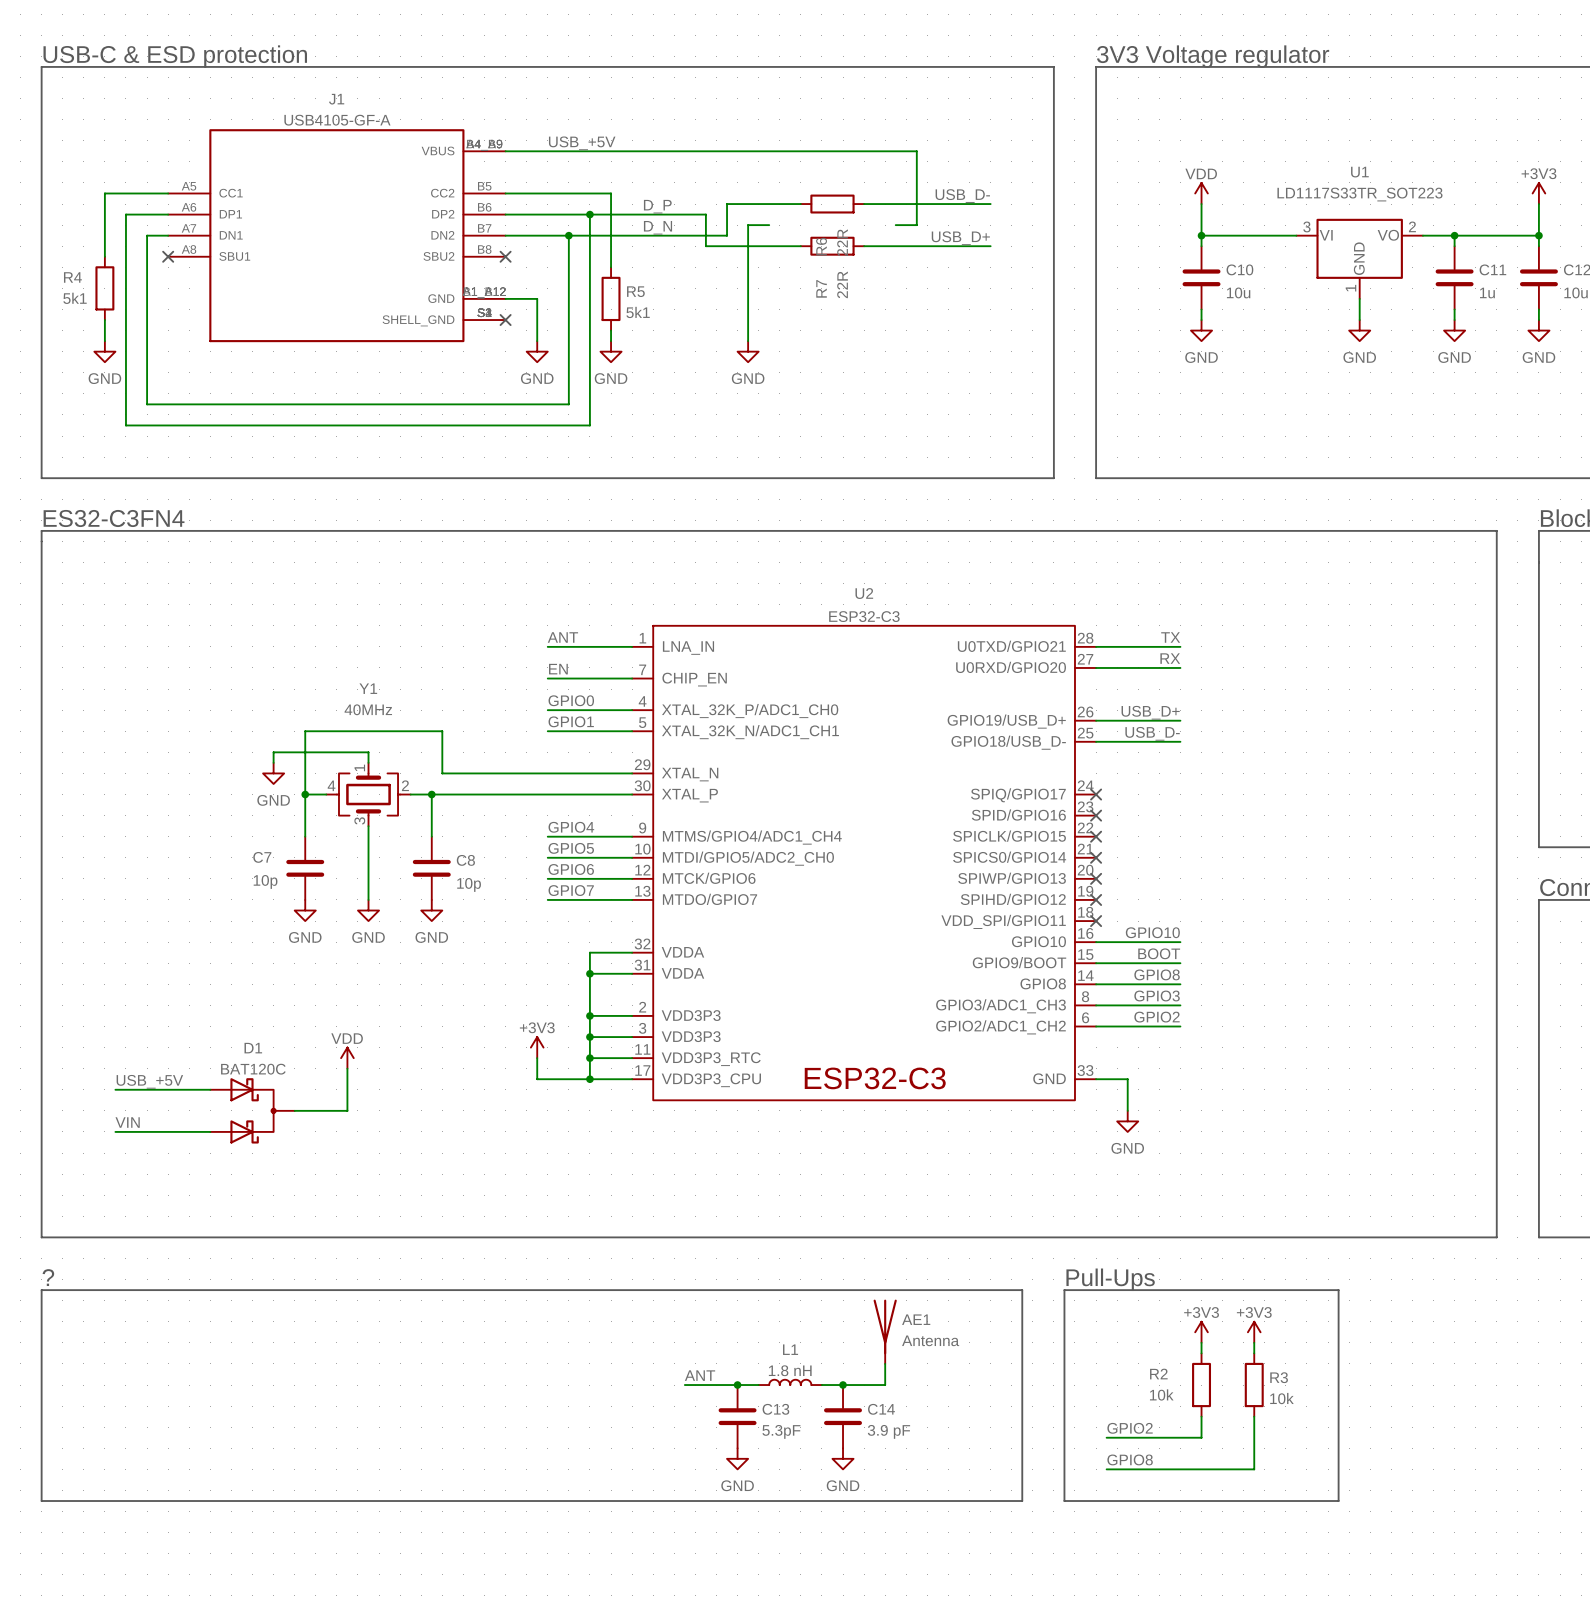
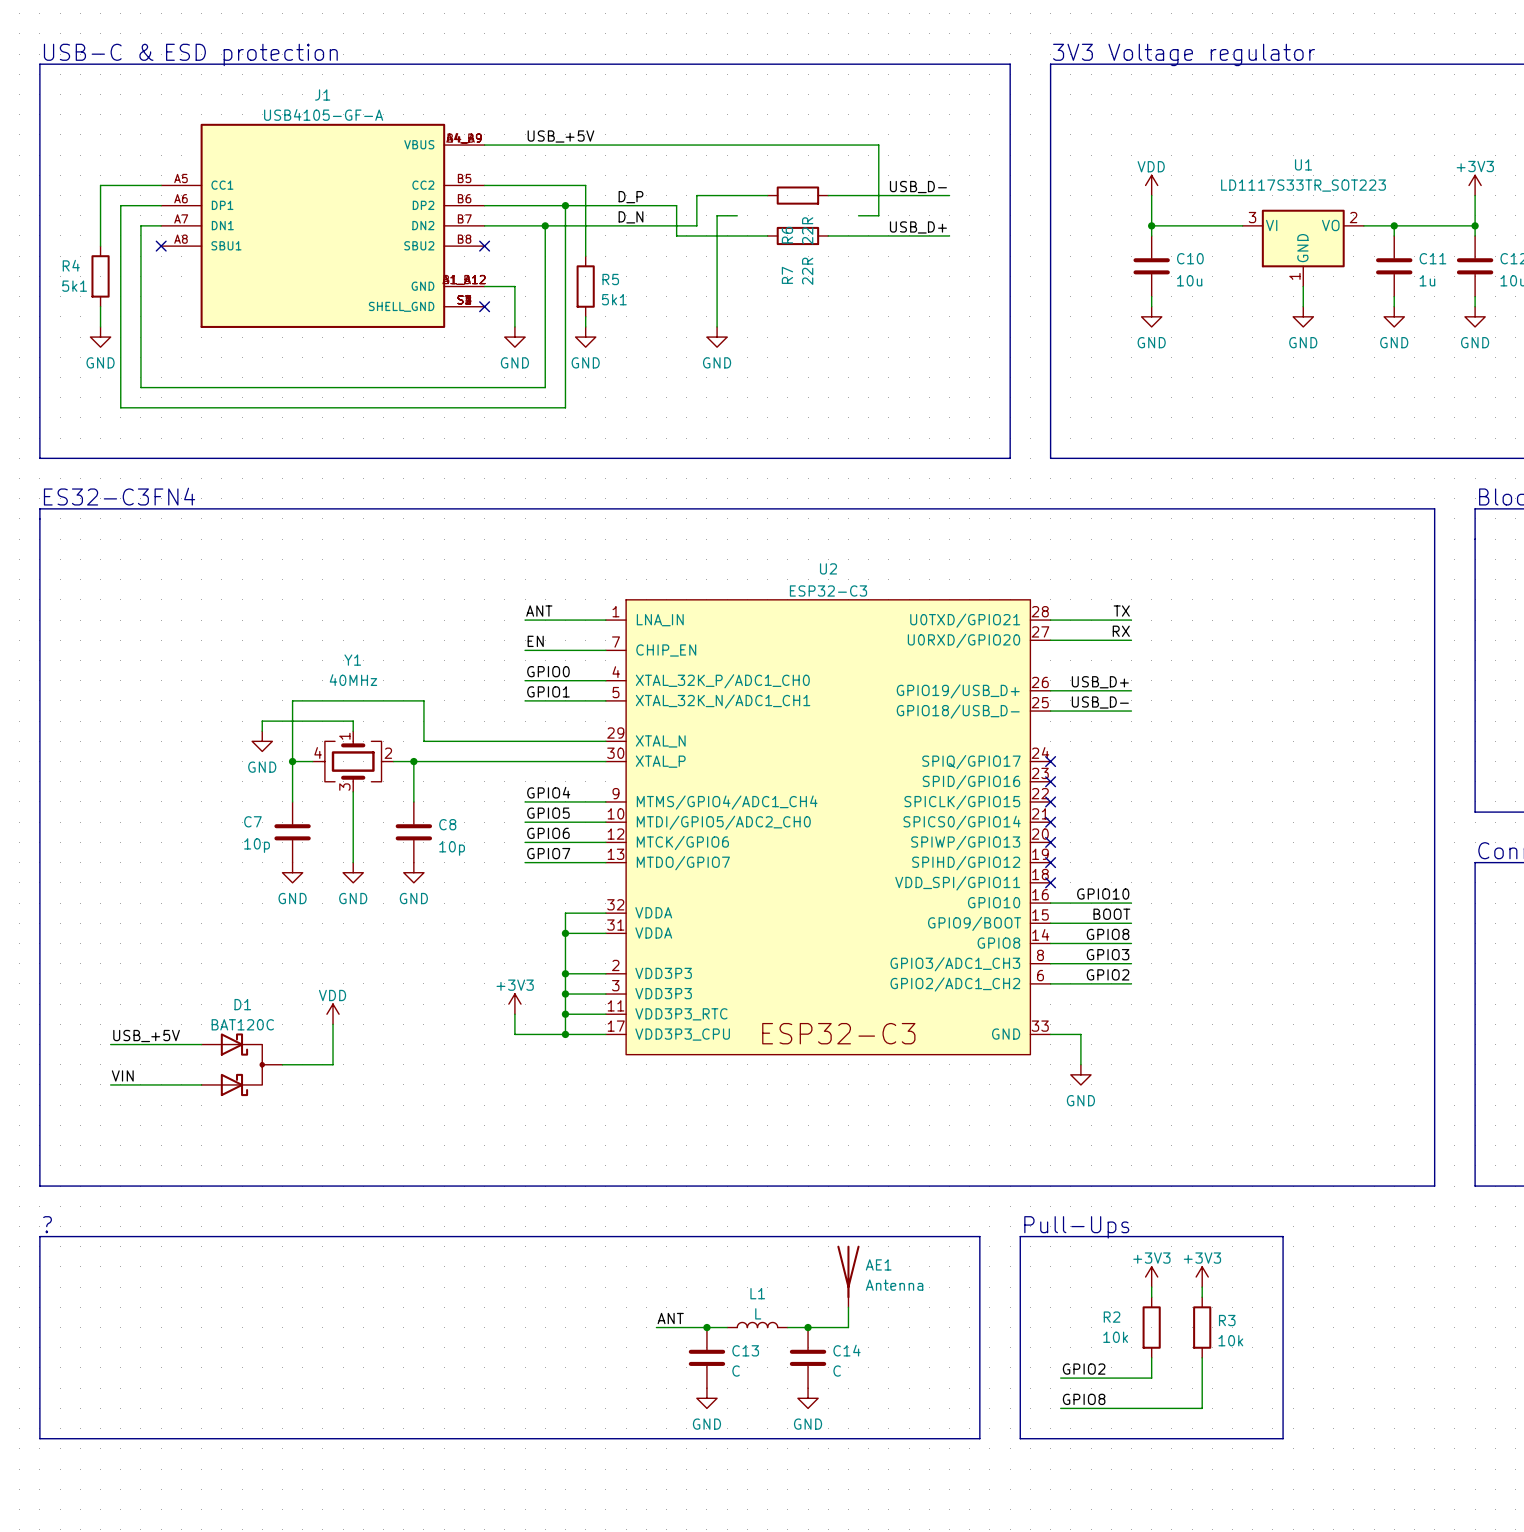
L1 value: 1.8 nH (790, 1370) -> L (758, 1313)
C13 value: 5.3pF (781, 1431) -> C (736, 1371)
C14 value: 3.9 pF (888, 1431) -> C (837, 1371)

